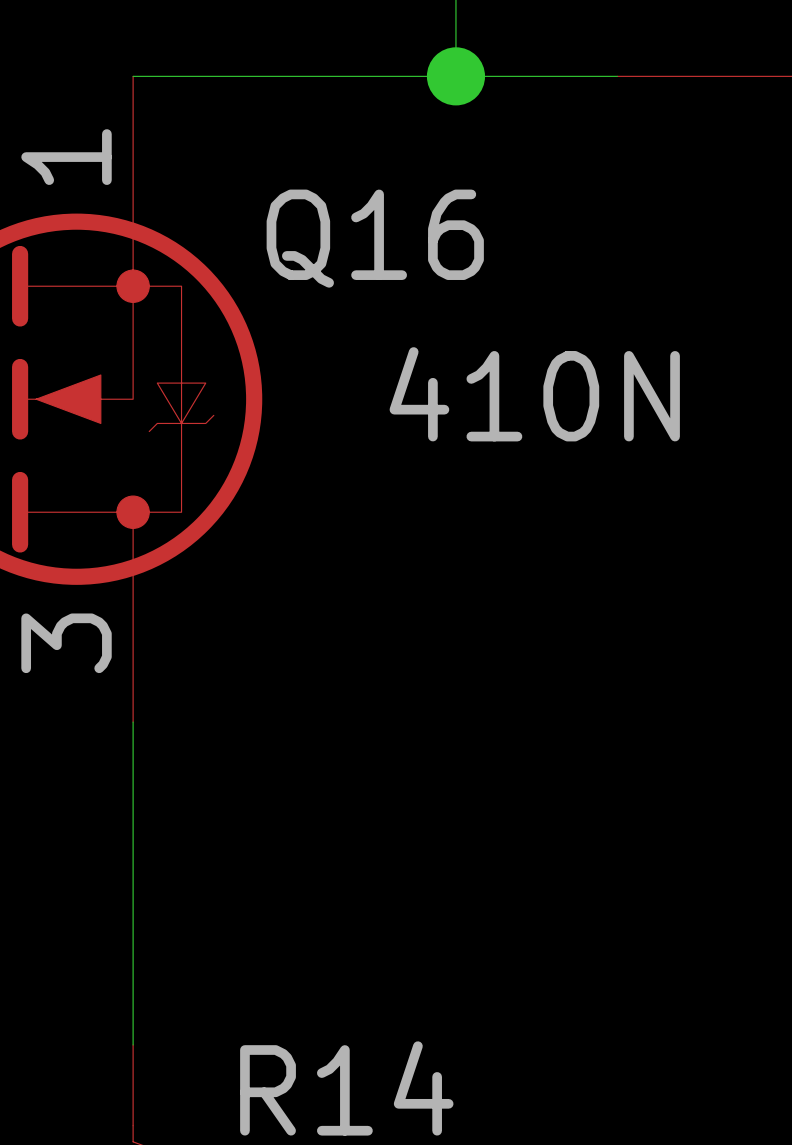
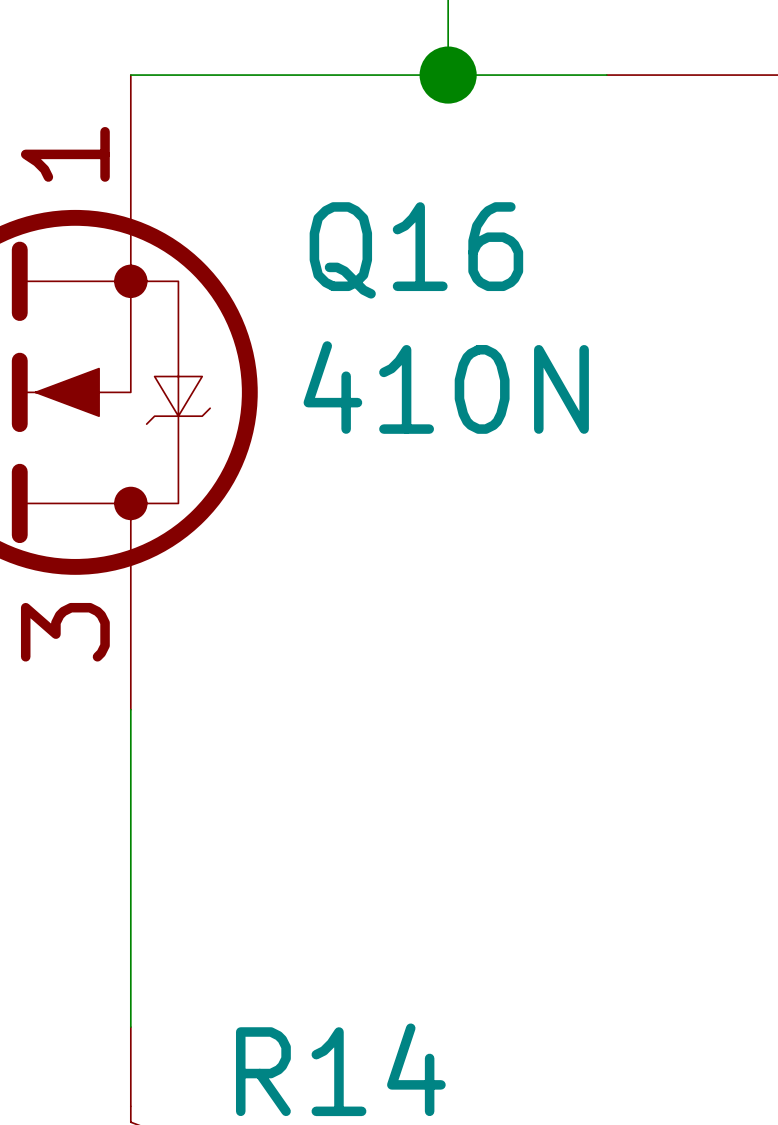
Q16 name position: Q16 (375, 238) -> Q16 (416, 250)
Q16 value position: 410N (534, 394) -> 410N (446, 387)

